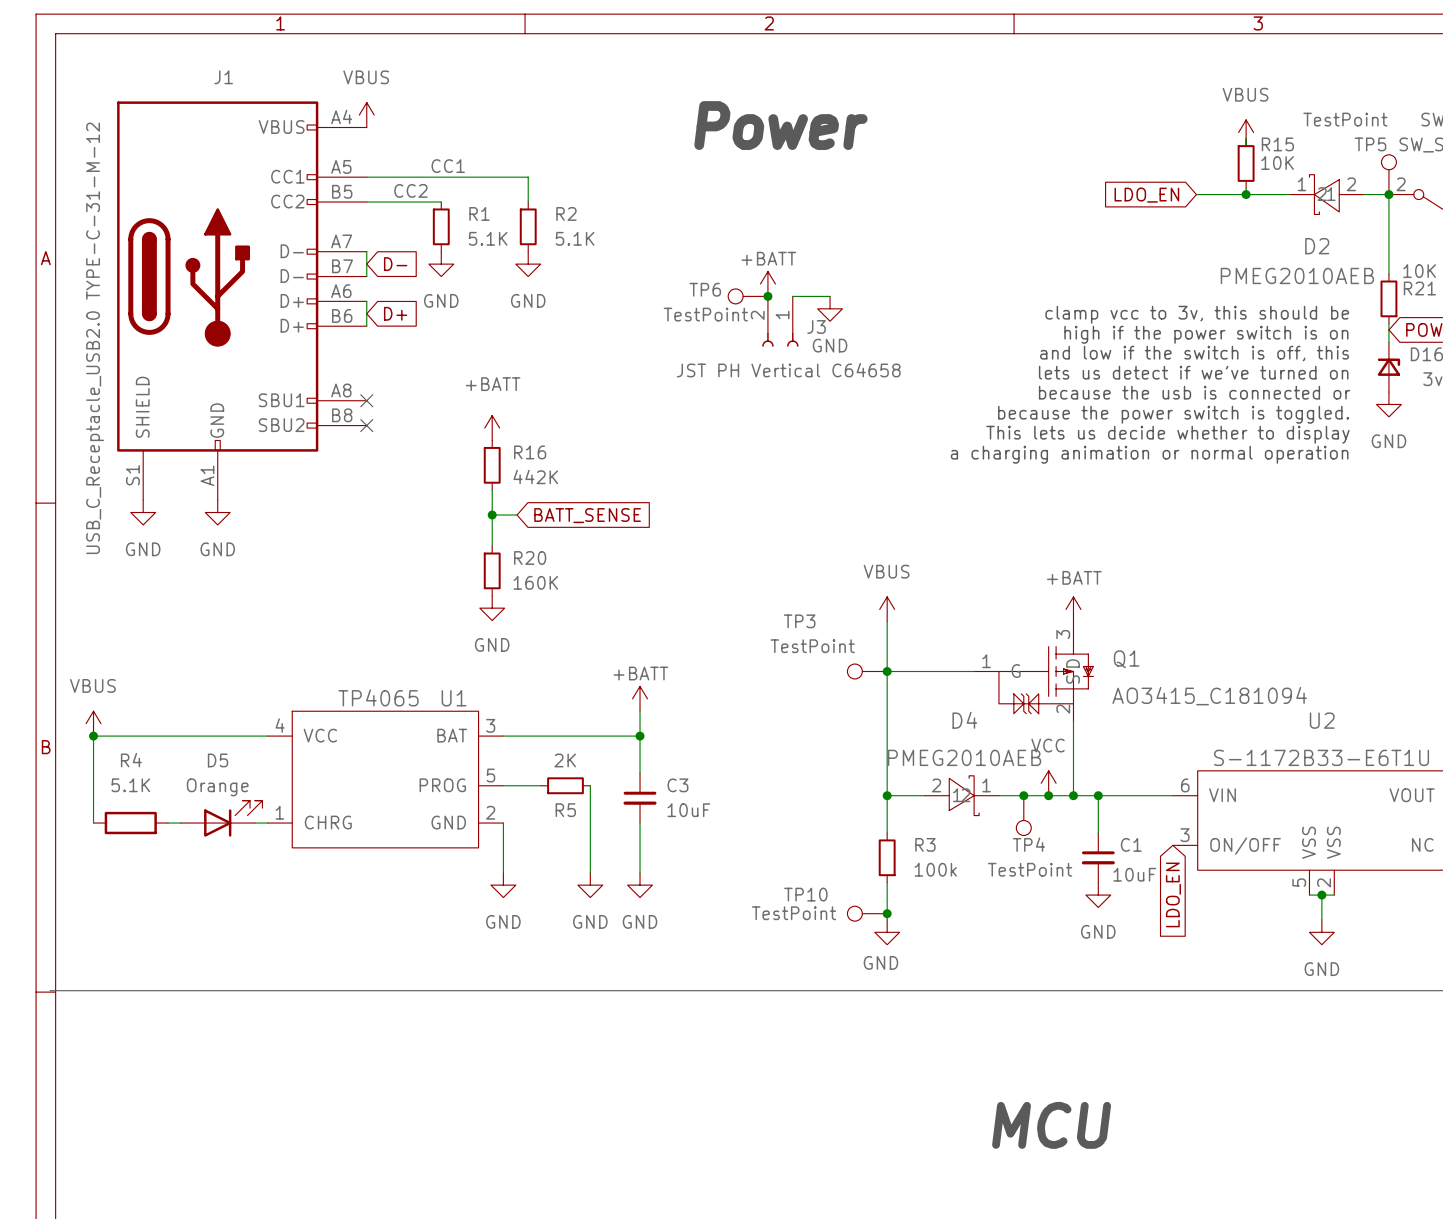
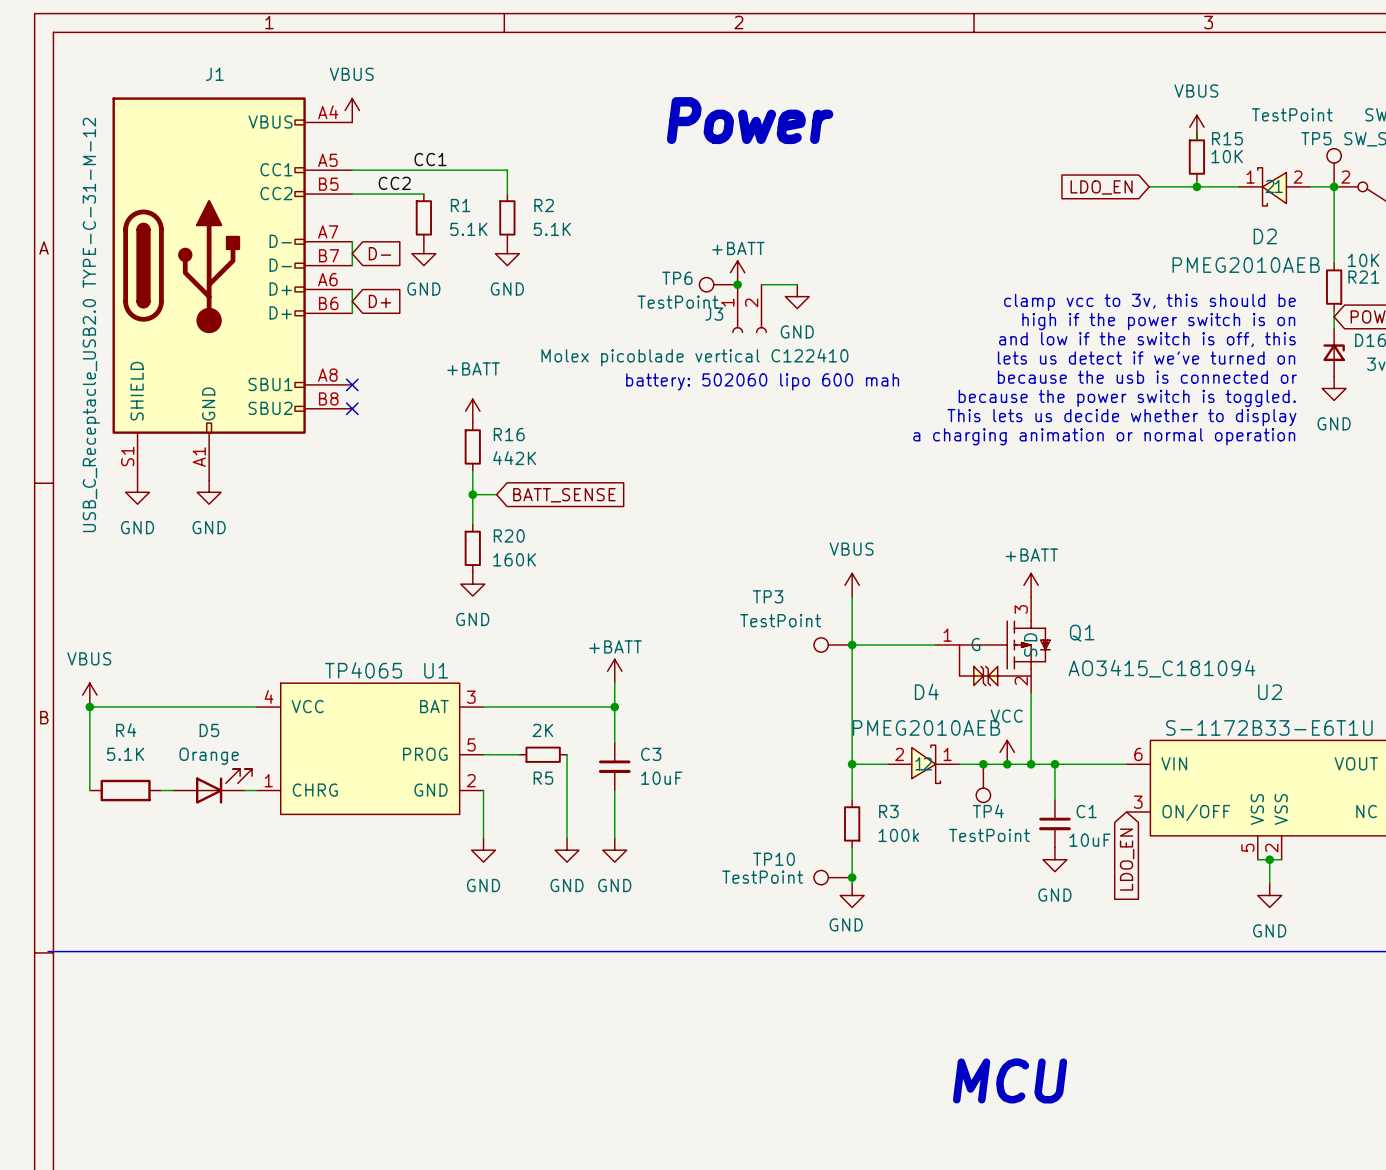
J3 flip: as is (780, 339) -> left-right (749, 326)
J3 value: JST PH Vertical C64658 (788, 370) -> Molex picoblade vertical C122410 (694, 357)
text: none -> battery: 502060 lipo 600 mah (762, 381)

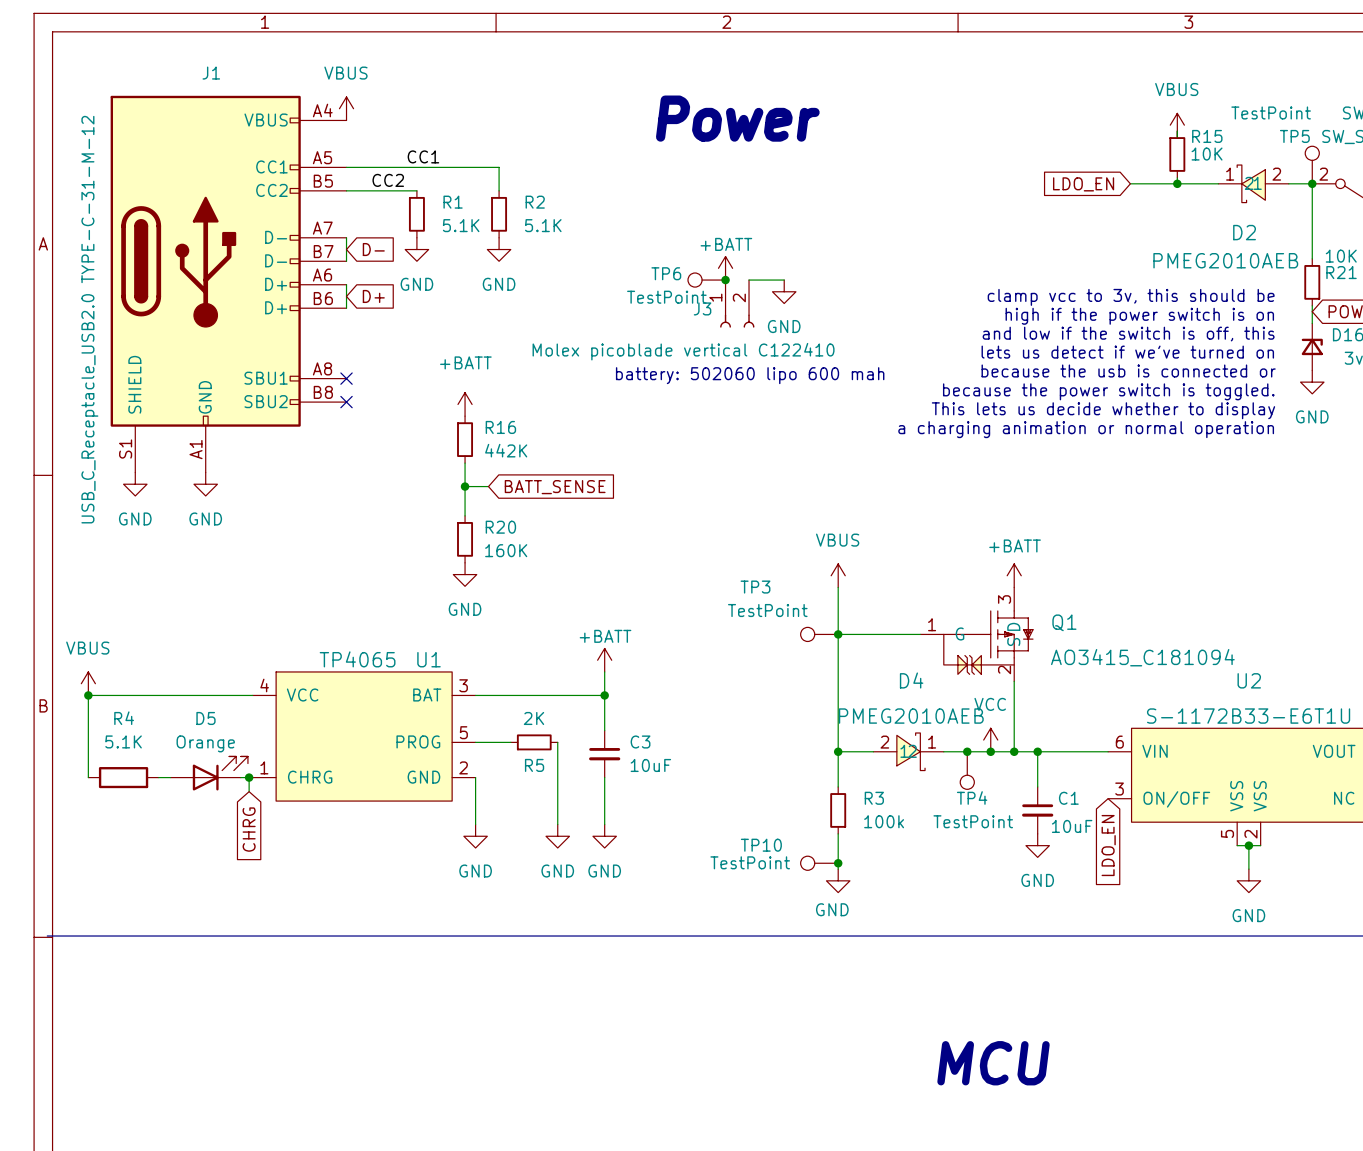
wire: none -> (249, 777) (249, 791)
junction: none -> (249, 777)
global label: none -> CHRG (249, 829)

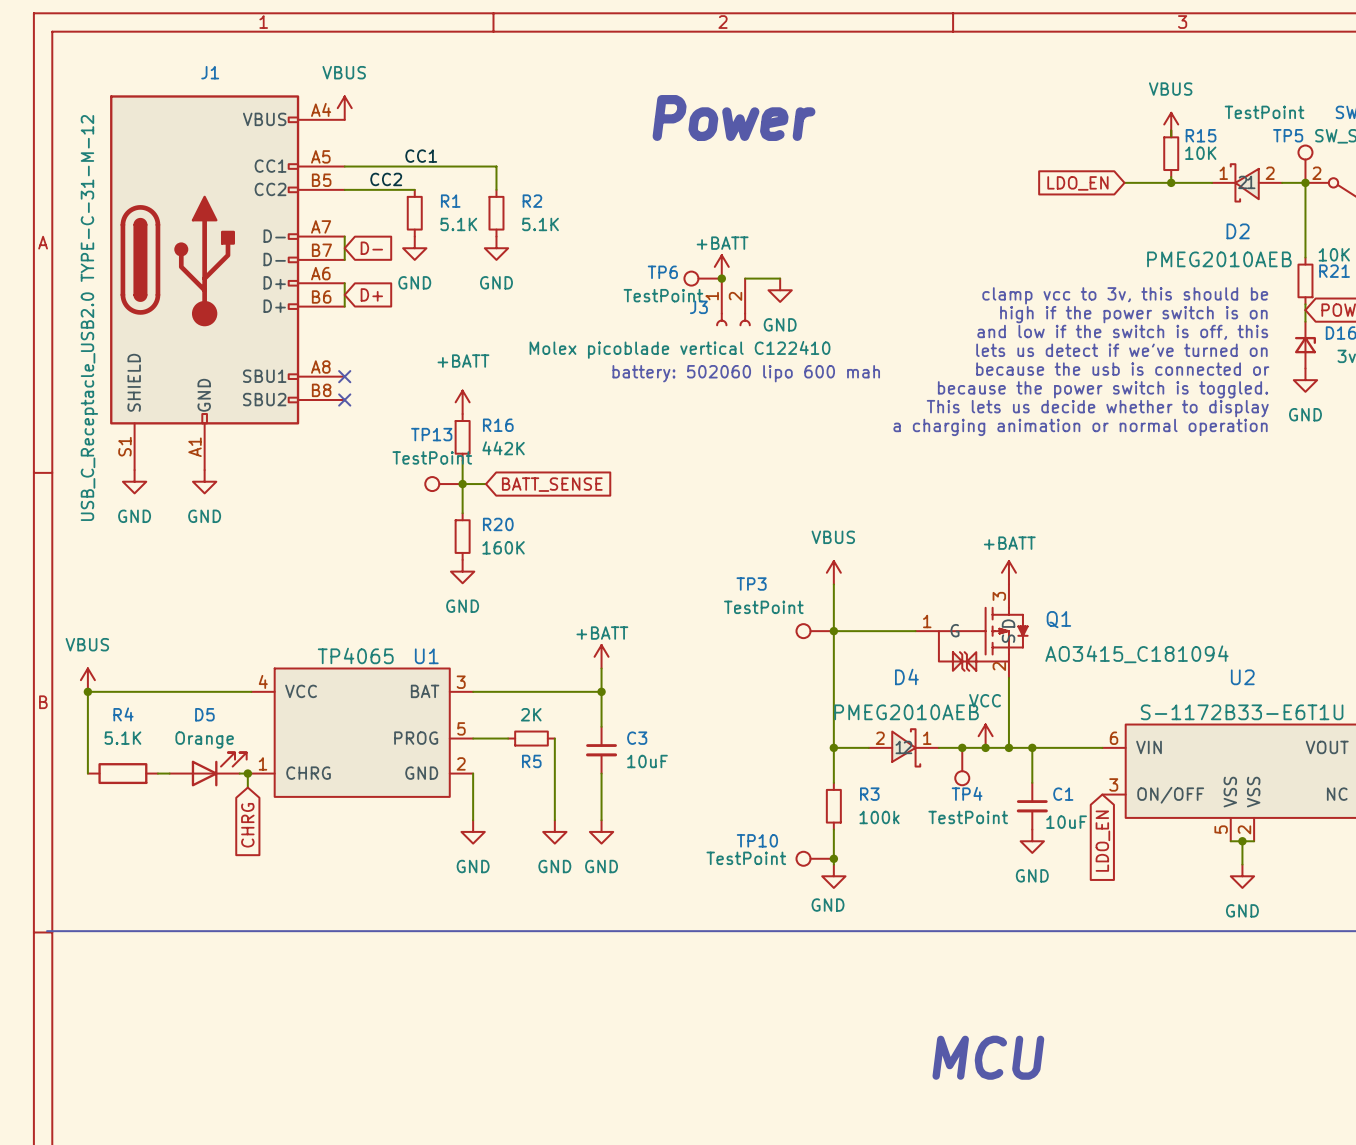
TP13: none -> TestPoint (443, 484)

